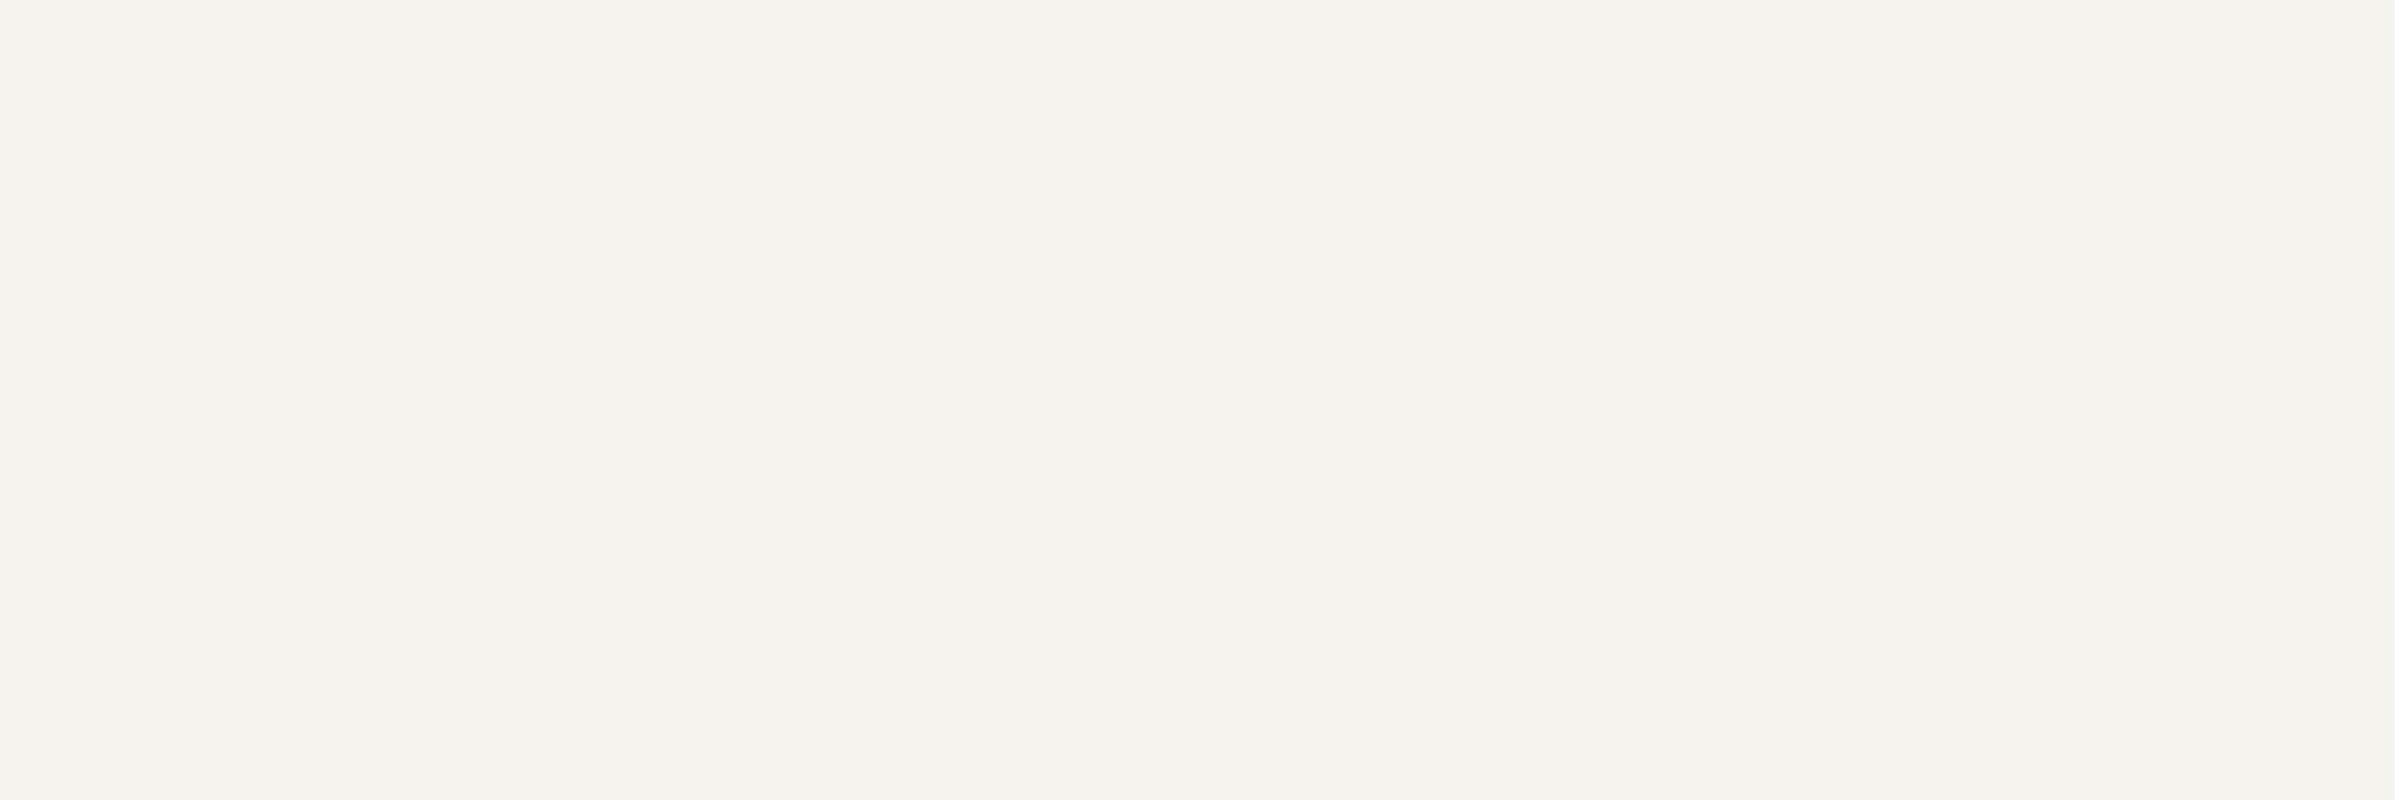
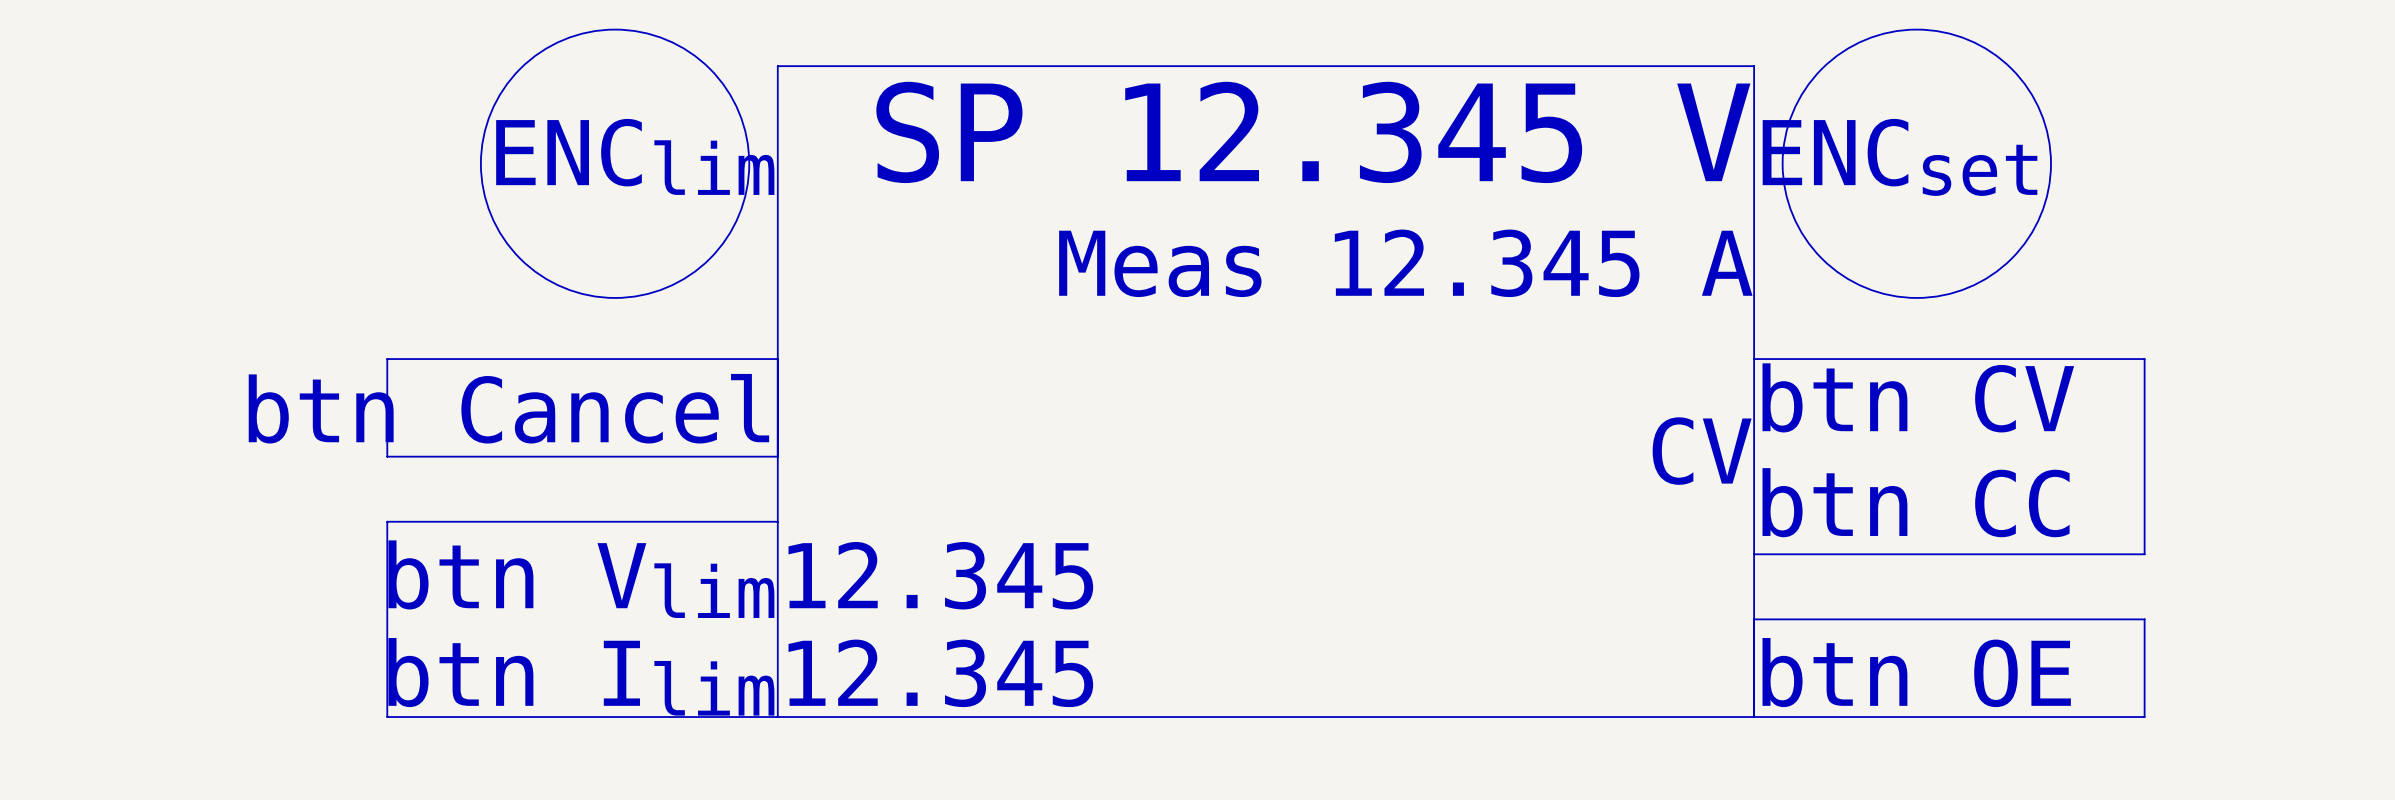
drawing: none -> [480, 29, 750, 298]
drawing: none -> [1782, 29, 2051, 298]
text: none -> SP 12.345 V (1313, 132)
text: none -> ENClim (635, 156)
text: none -> ENCset (1900, 157)
text: none -> Meas 12.345 A (1405, 263)
line: none -> (777, 359) (387, 359) (387, 456) (777, 456)
line: none -> (1754, 359) (2144, 359) (2144, 554) (1754, 554)
text: none -> btn CV (1918, 397)
text: none -> btn Cancel (508, 408)
text: none -> CV (1702, 451)
text: none -> btn CC (1916, 502)
line: none -> (777, 521) (387, 521) (387, 717) (2144, 717) (2144, 619) (1754, 619)
text: none -> 12.345 (940, 575)
text: none -> btn Vlim (581, 579)
text: none -> btn OE (1916, 672)
text: none -> 12.345 (940, 673)
text: none -> btn Ilim (581, 676)
line: none -> (777, 717) (777, 66) (1754, 66) (1754, 717)

